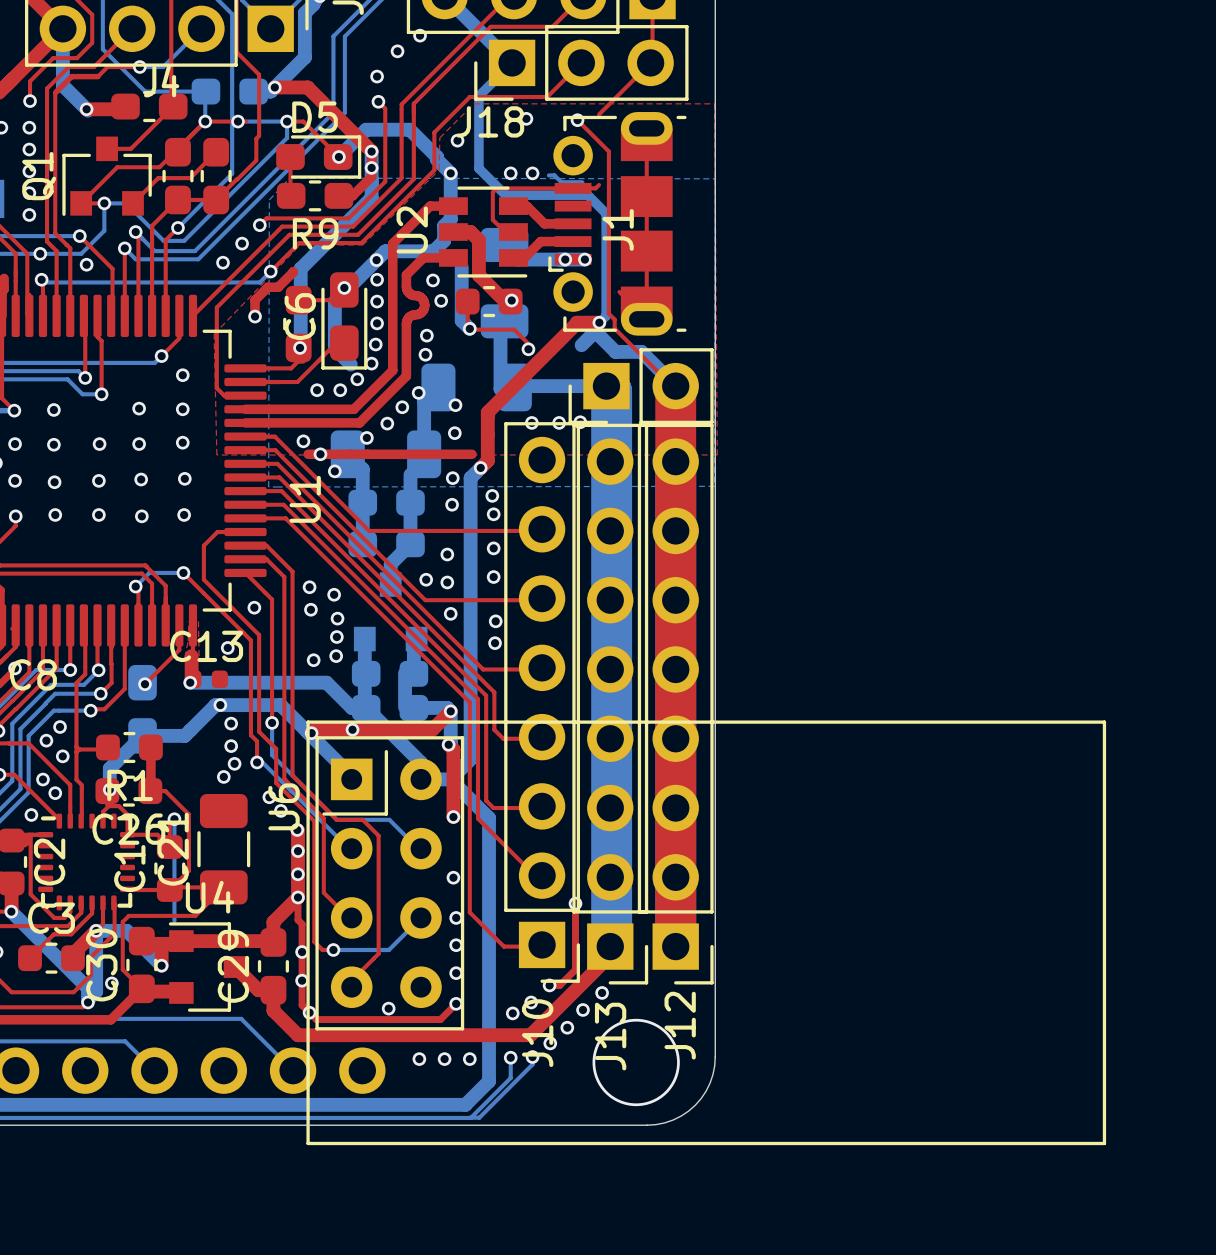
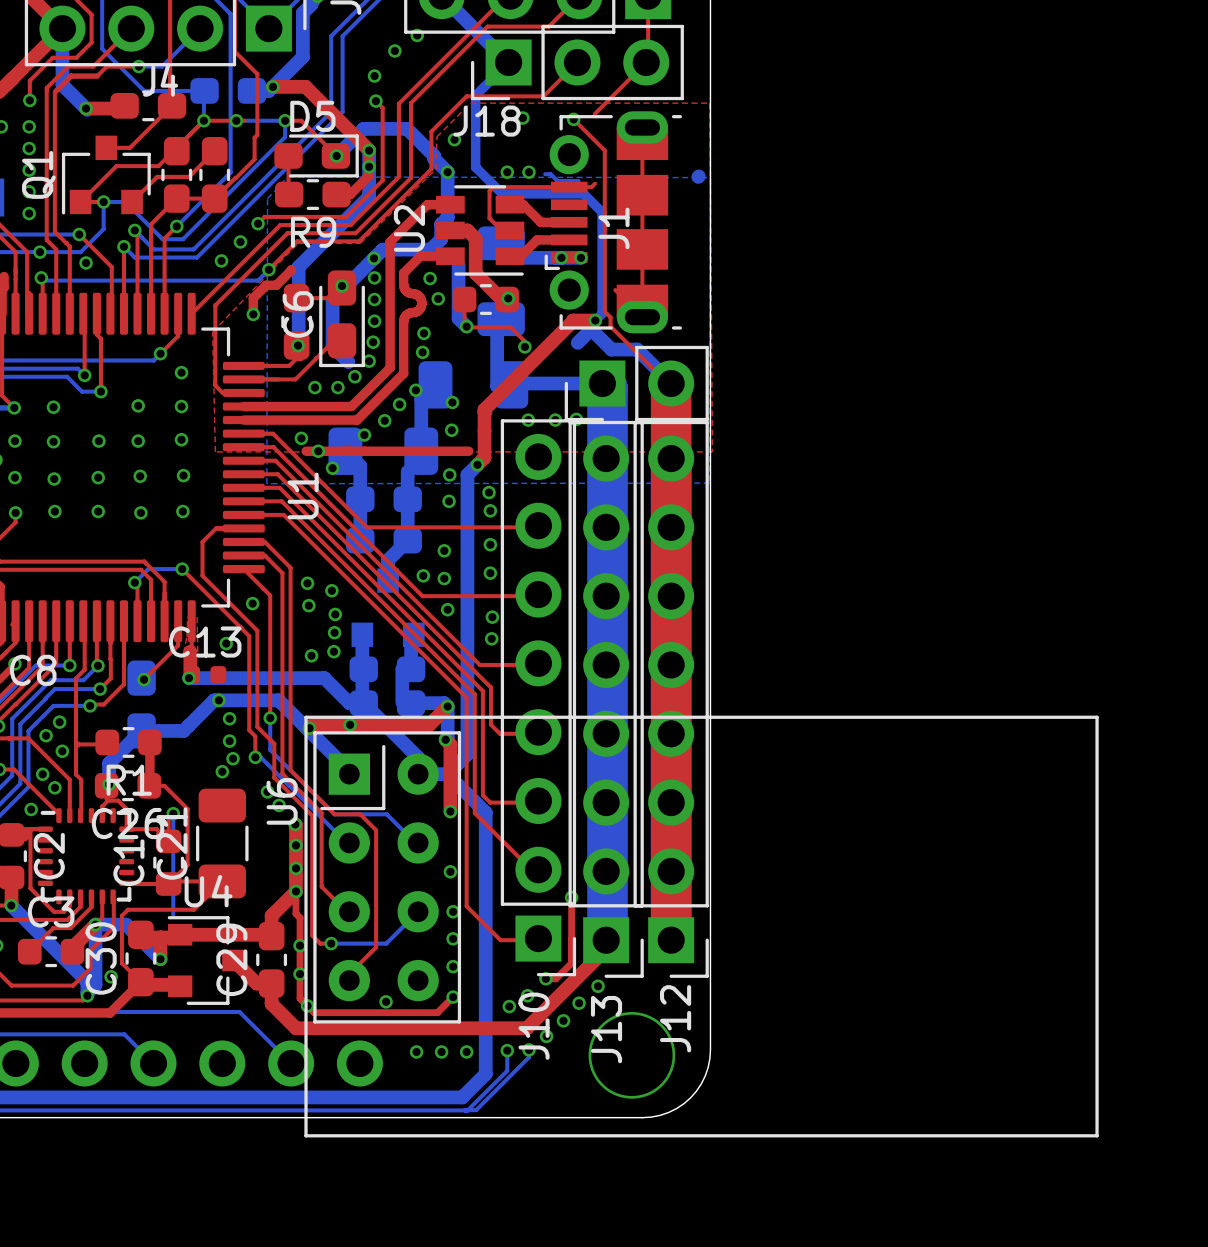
bottom track: none -> (698, 176) (698, 176)

